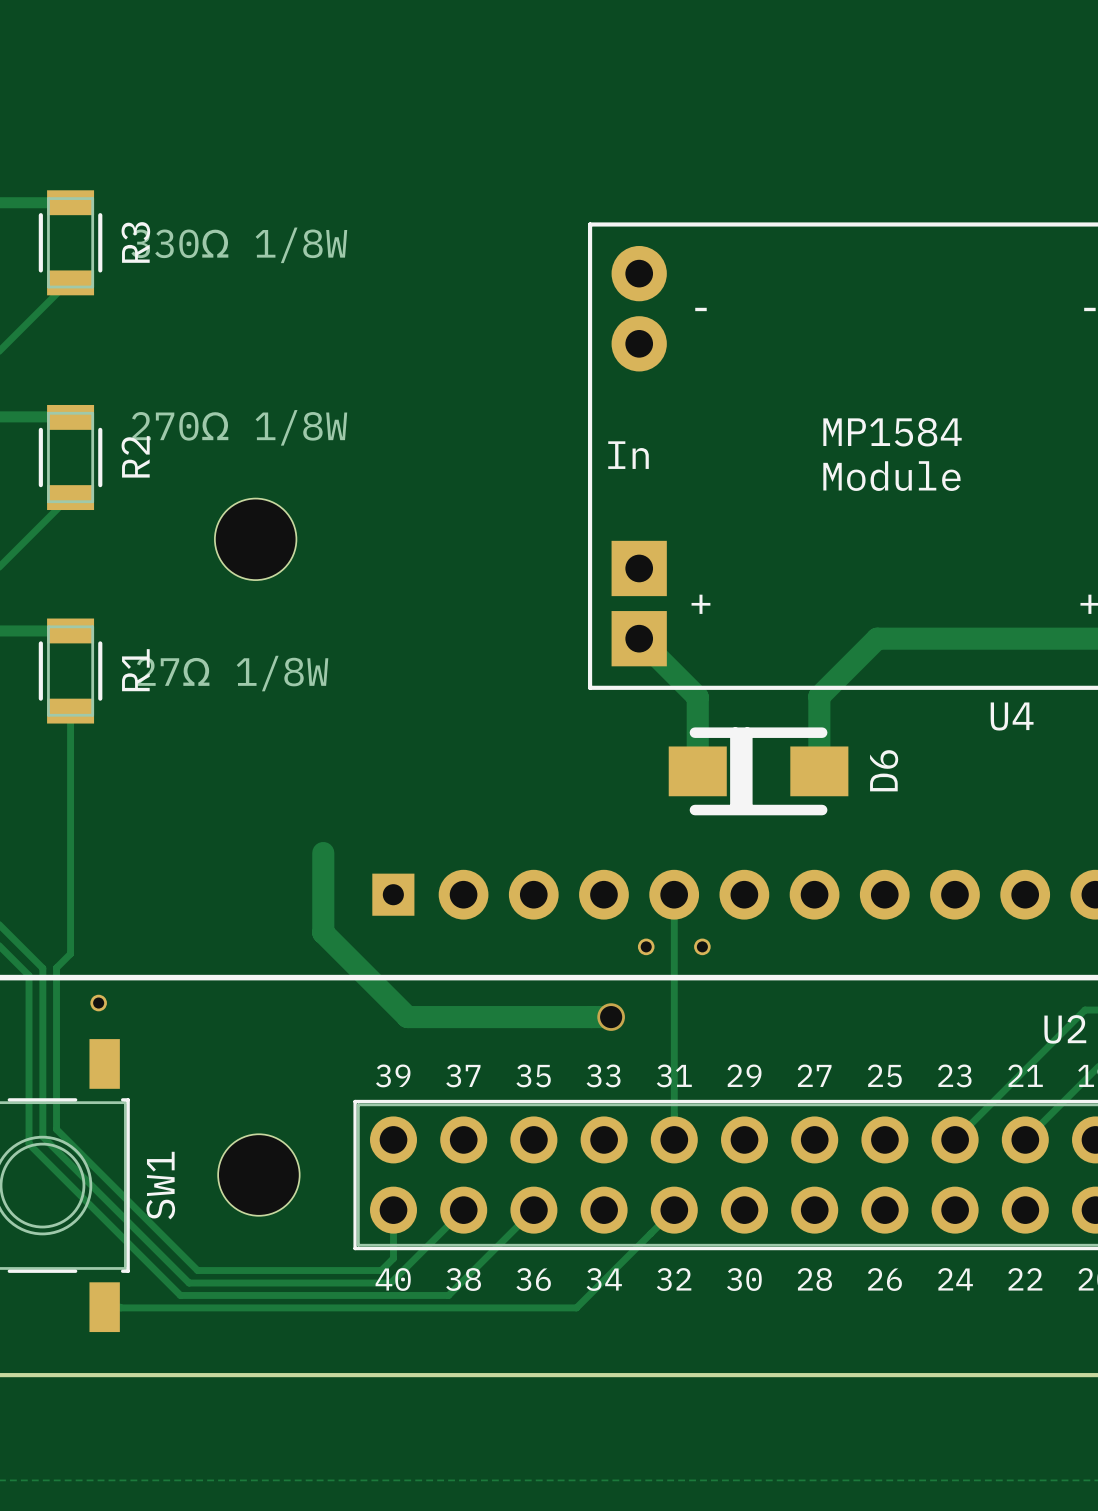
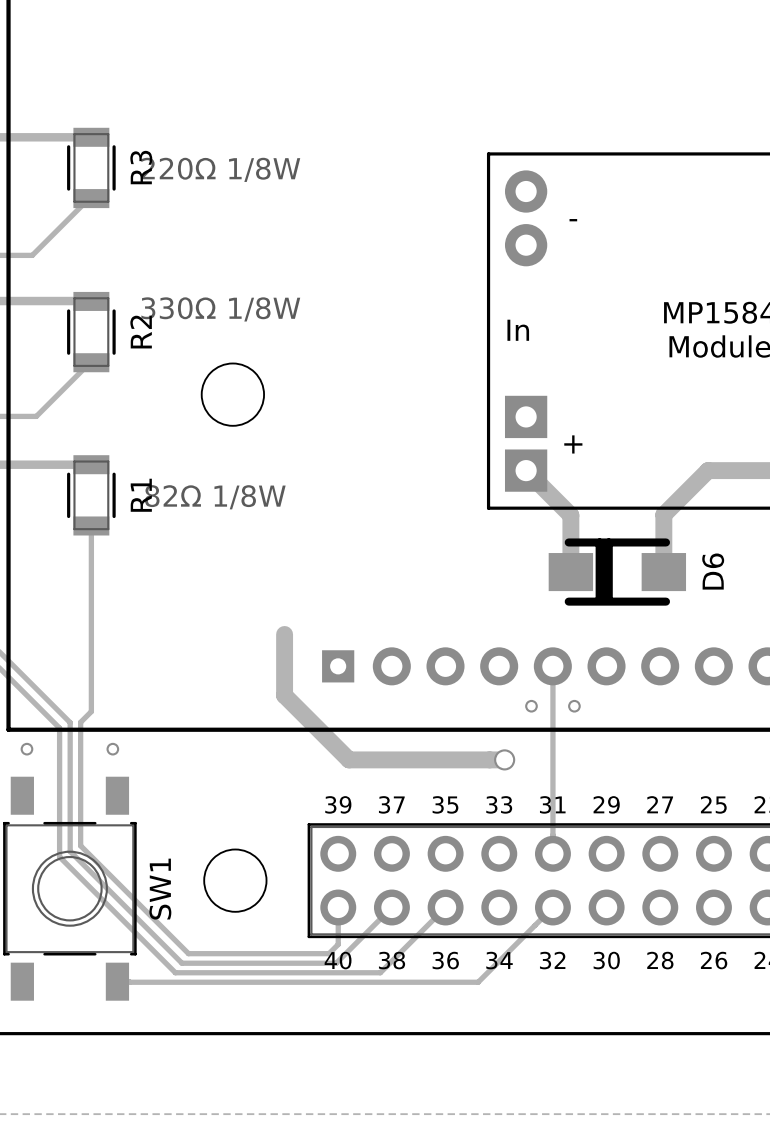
R3 value: 330Ω 1/8W (239, 245) -> 220Ω 1/8W (220, 169)
R2 value: 270Ω 1/8W (239, 427) -> 330Ω 1/8W (220, 309)
R1 value: 27Ω 1/8W (232, 673) -> 82Ω 1/8W (215, 497)

